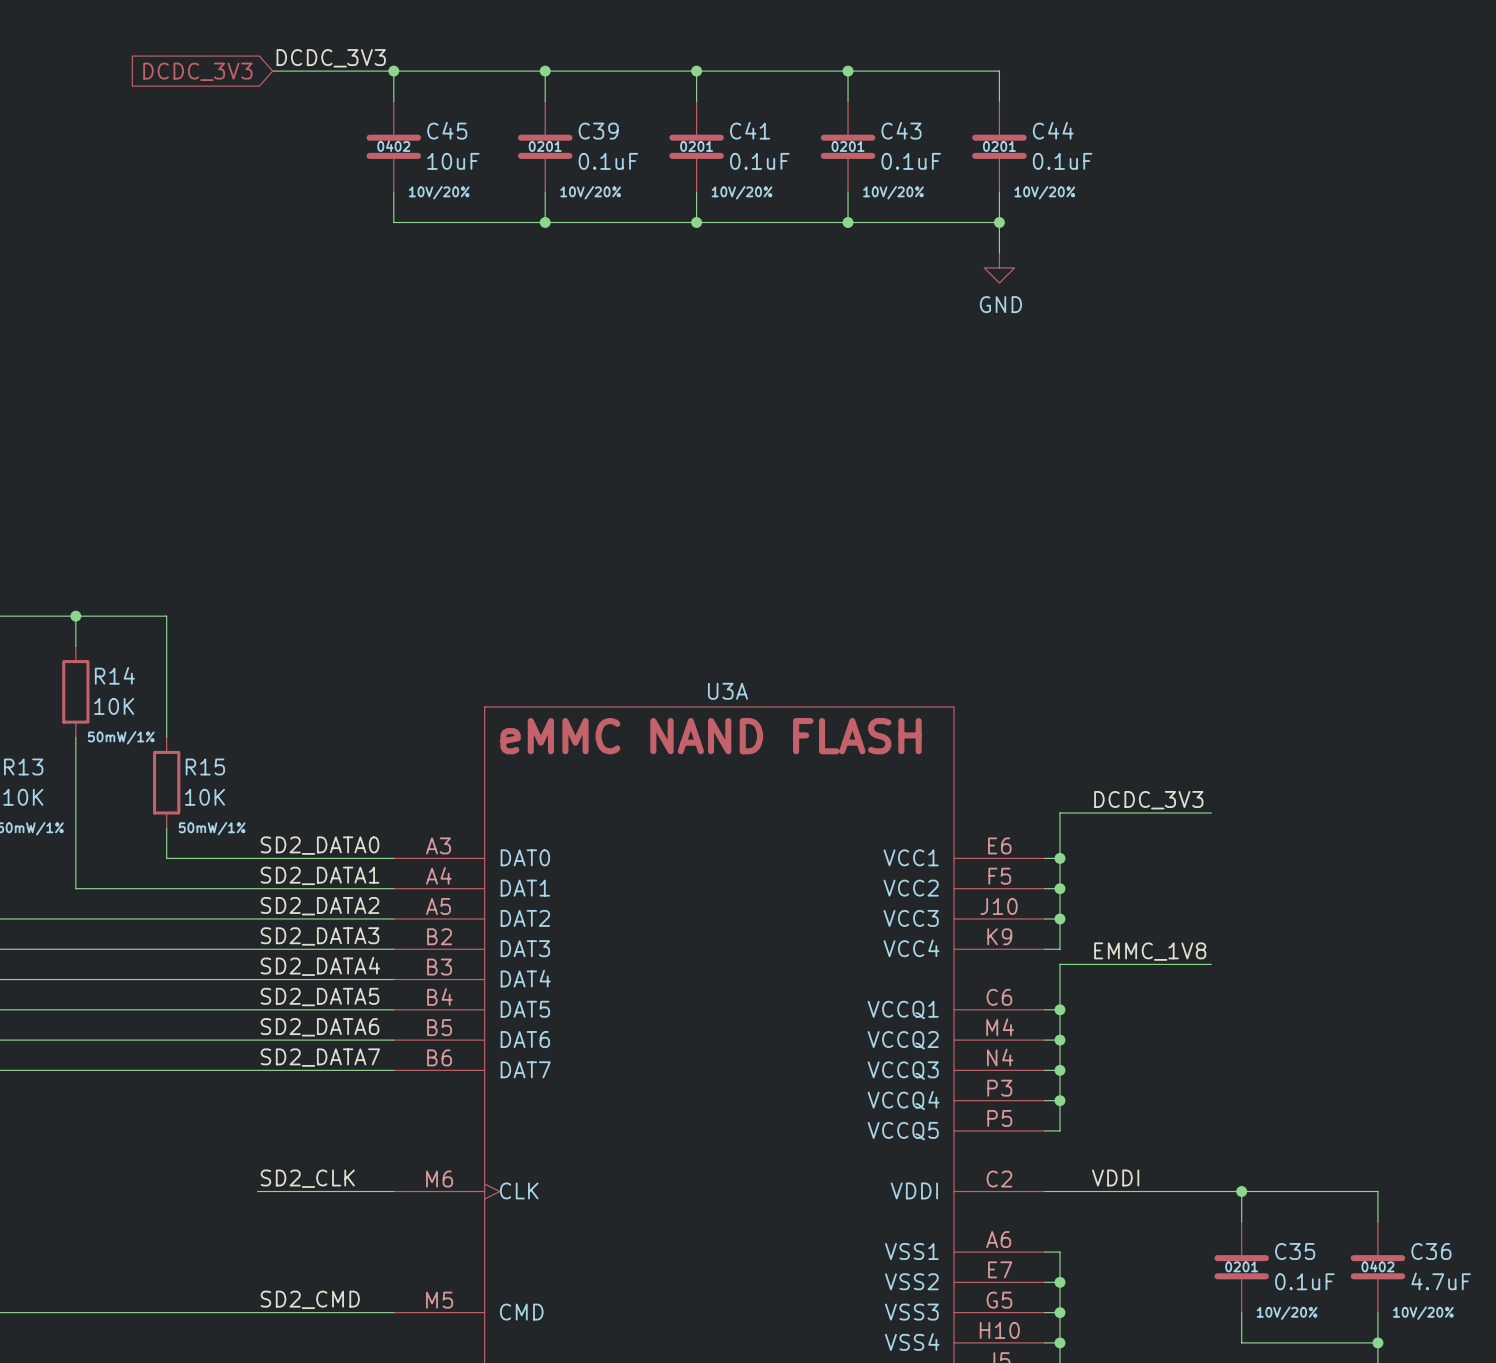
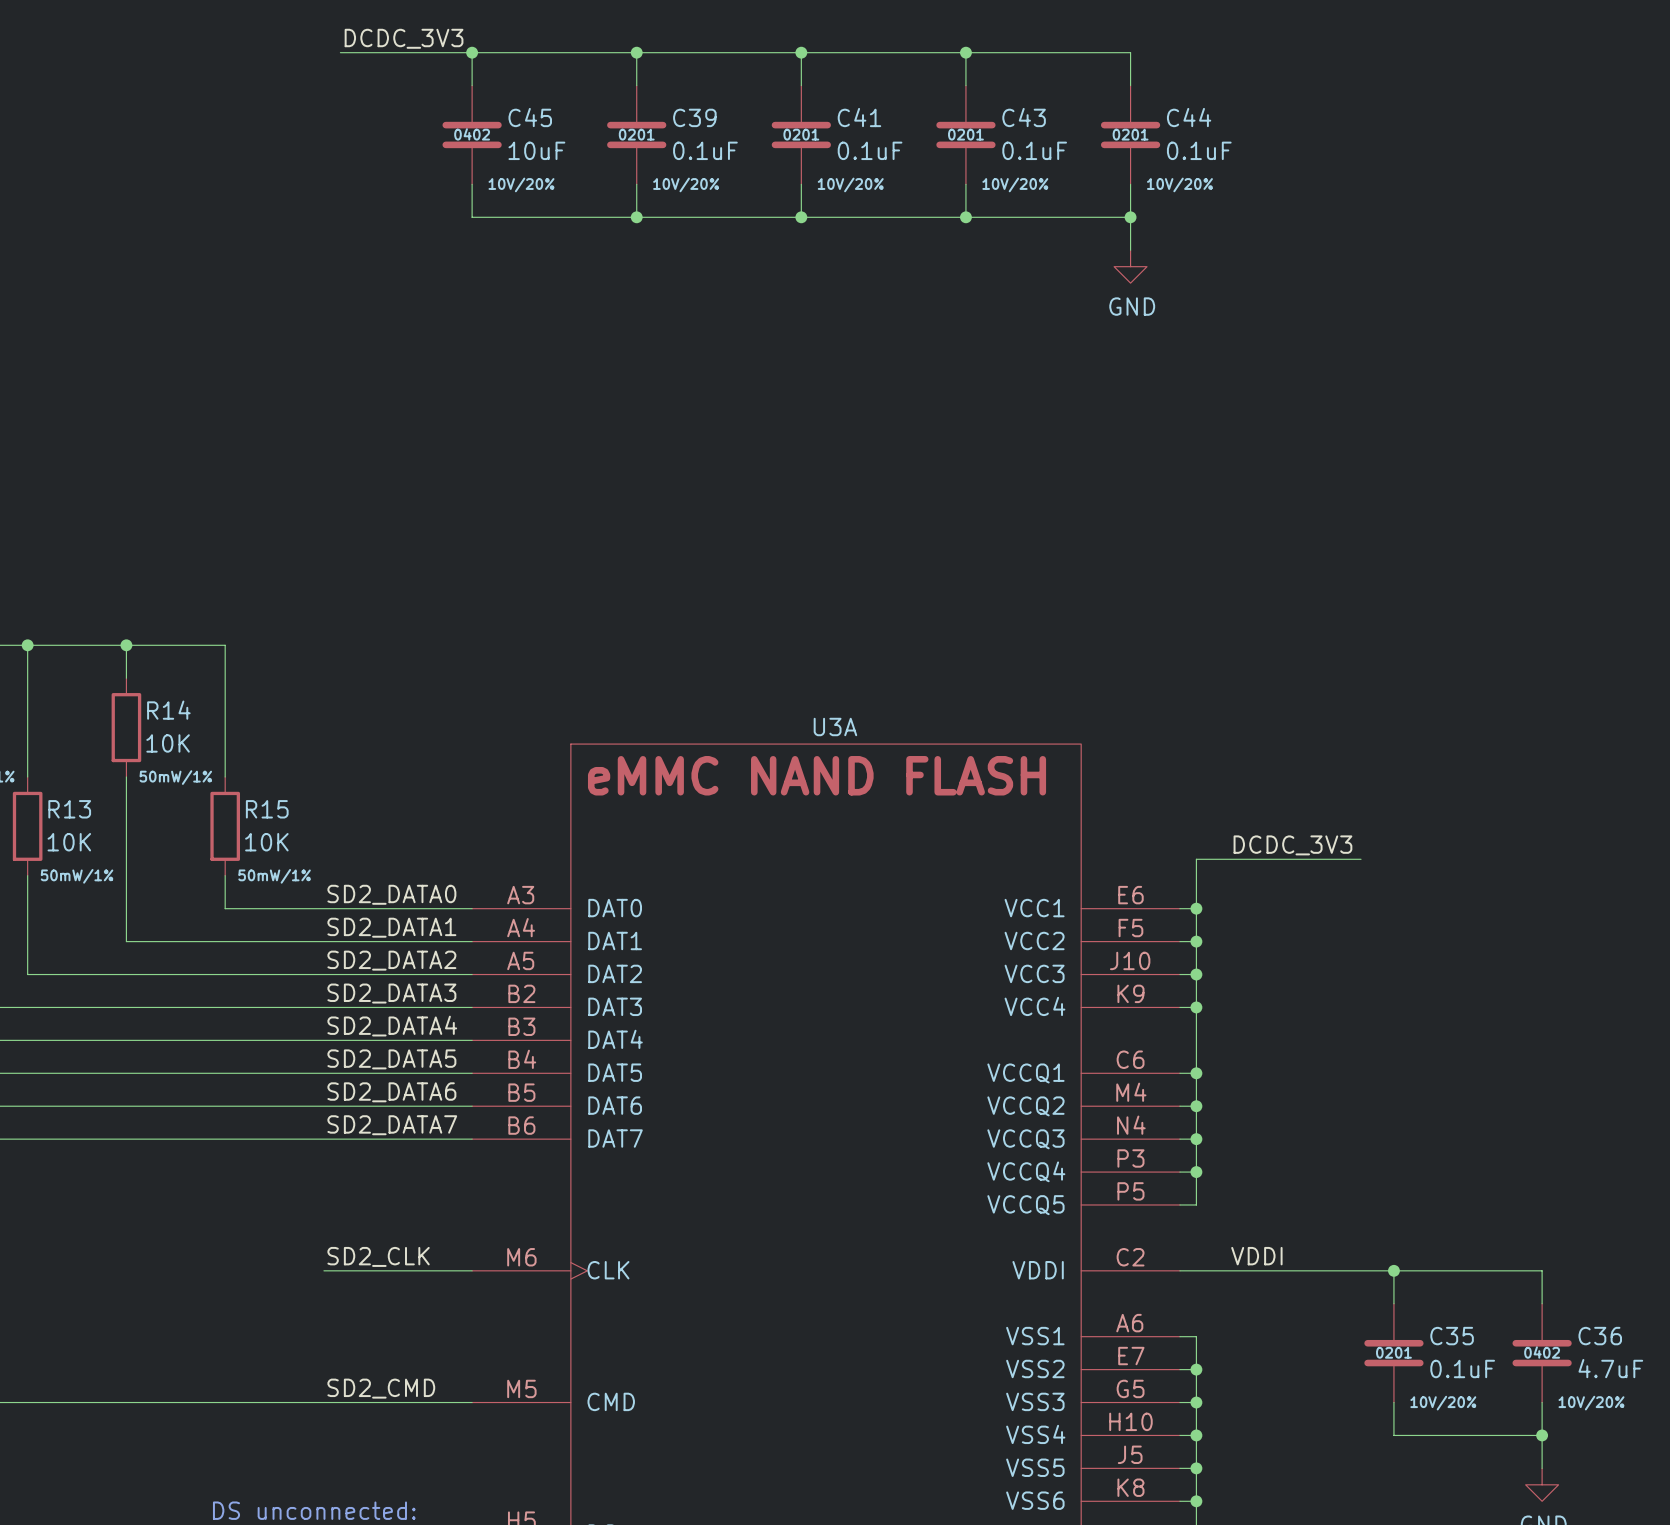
global label: DCDC_3V3 (197, 71) -> none
junction: none -> (1196, 1007)
label: EMMC_1V8 (1150, 951) -> none
wire: (1059, 964) (1211, 964) -> (1196, 1023) (1196, 1007)

